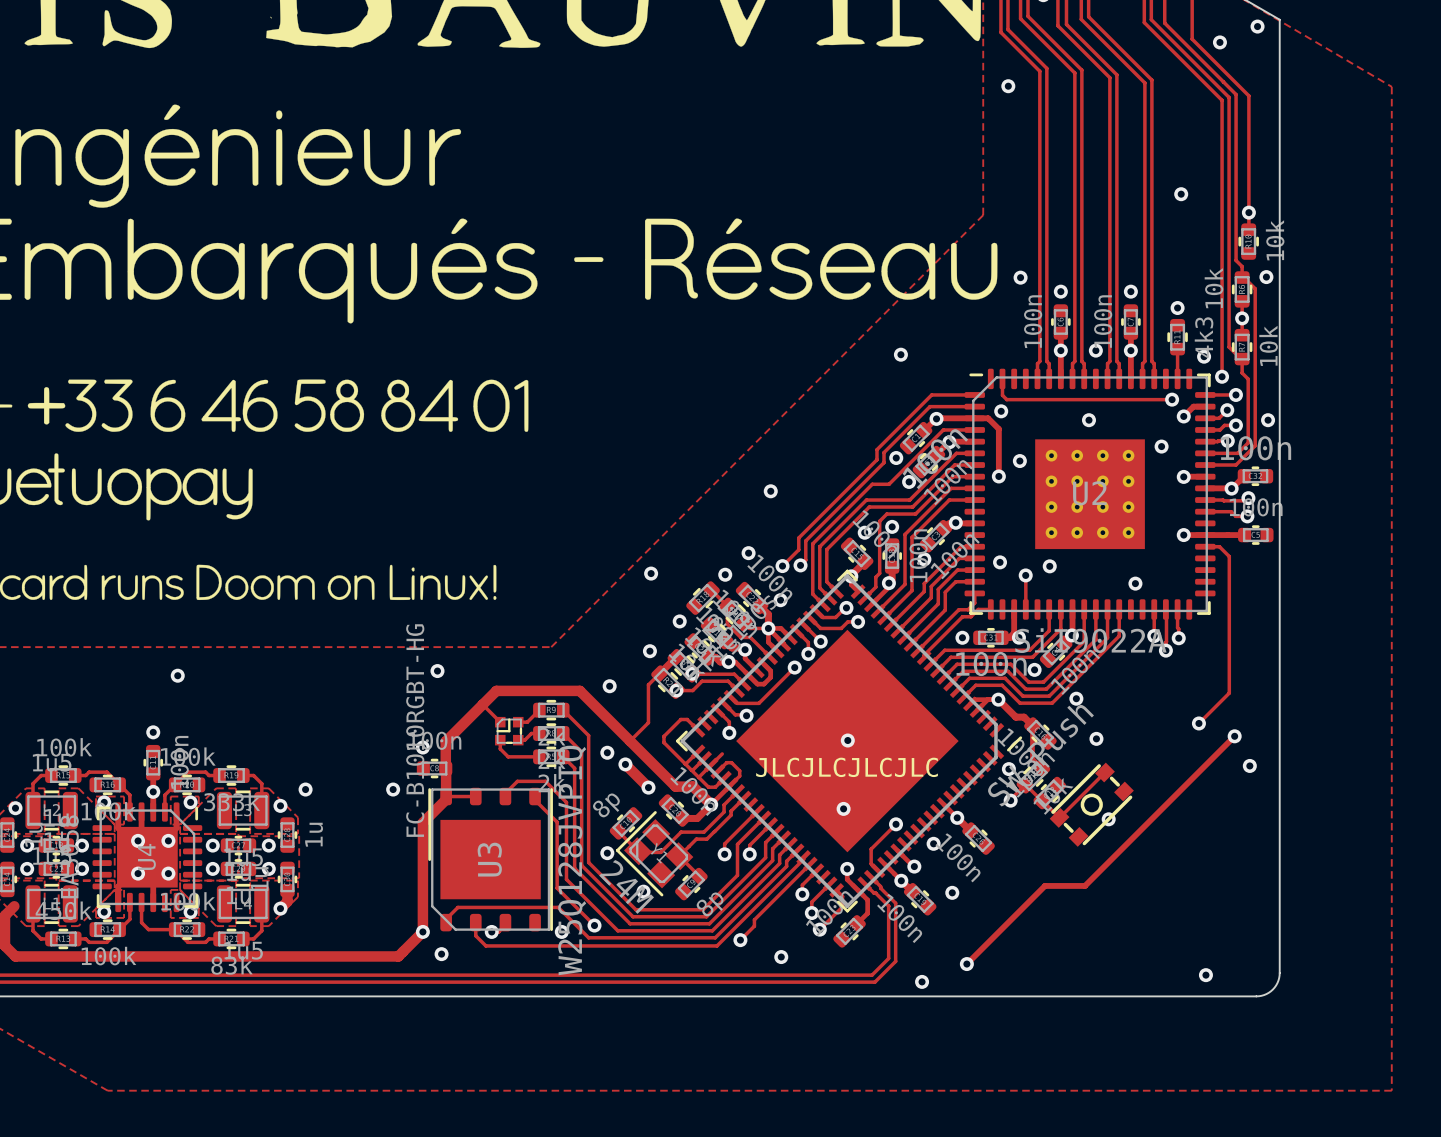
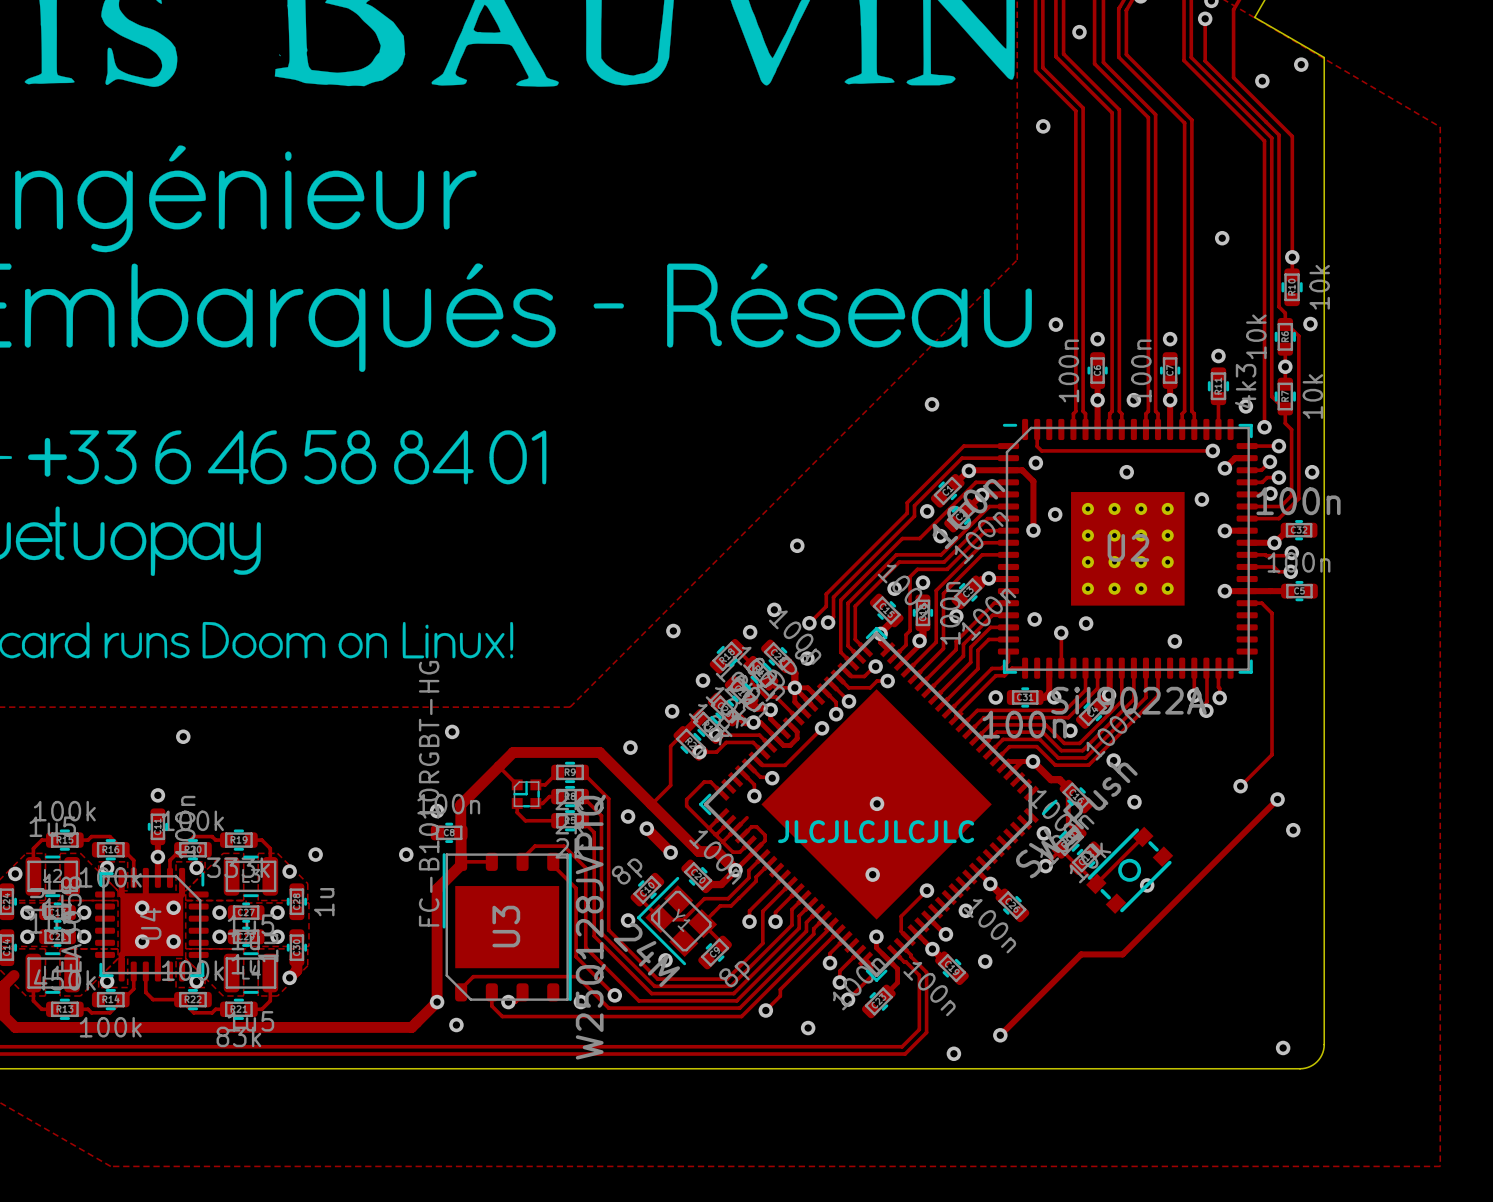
via position: (1205, 975) -> (1283, 1047)

